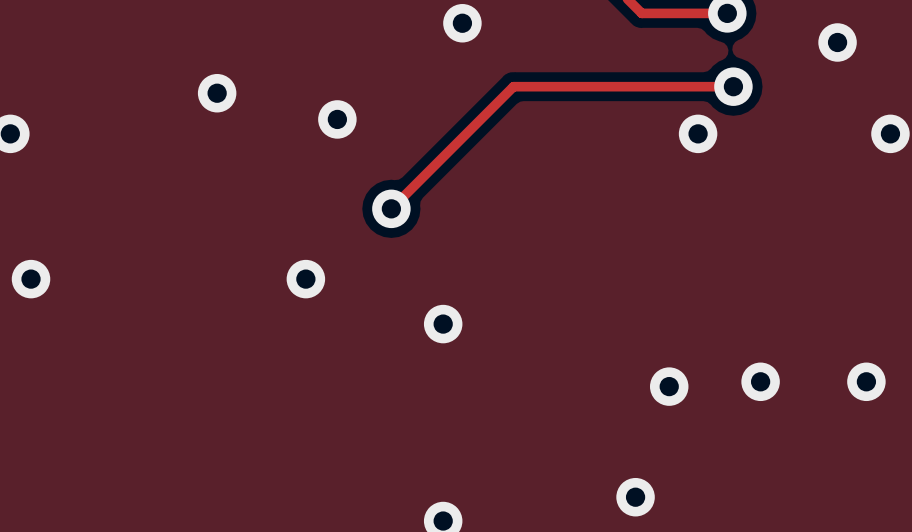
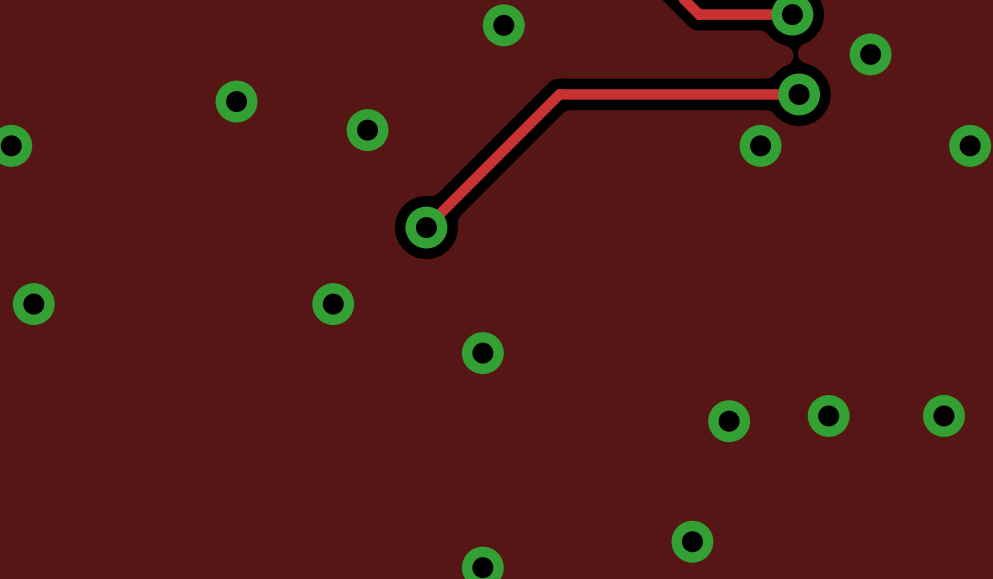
via position: (837, 42) -> (870, 54)

